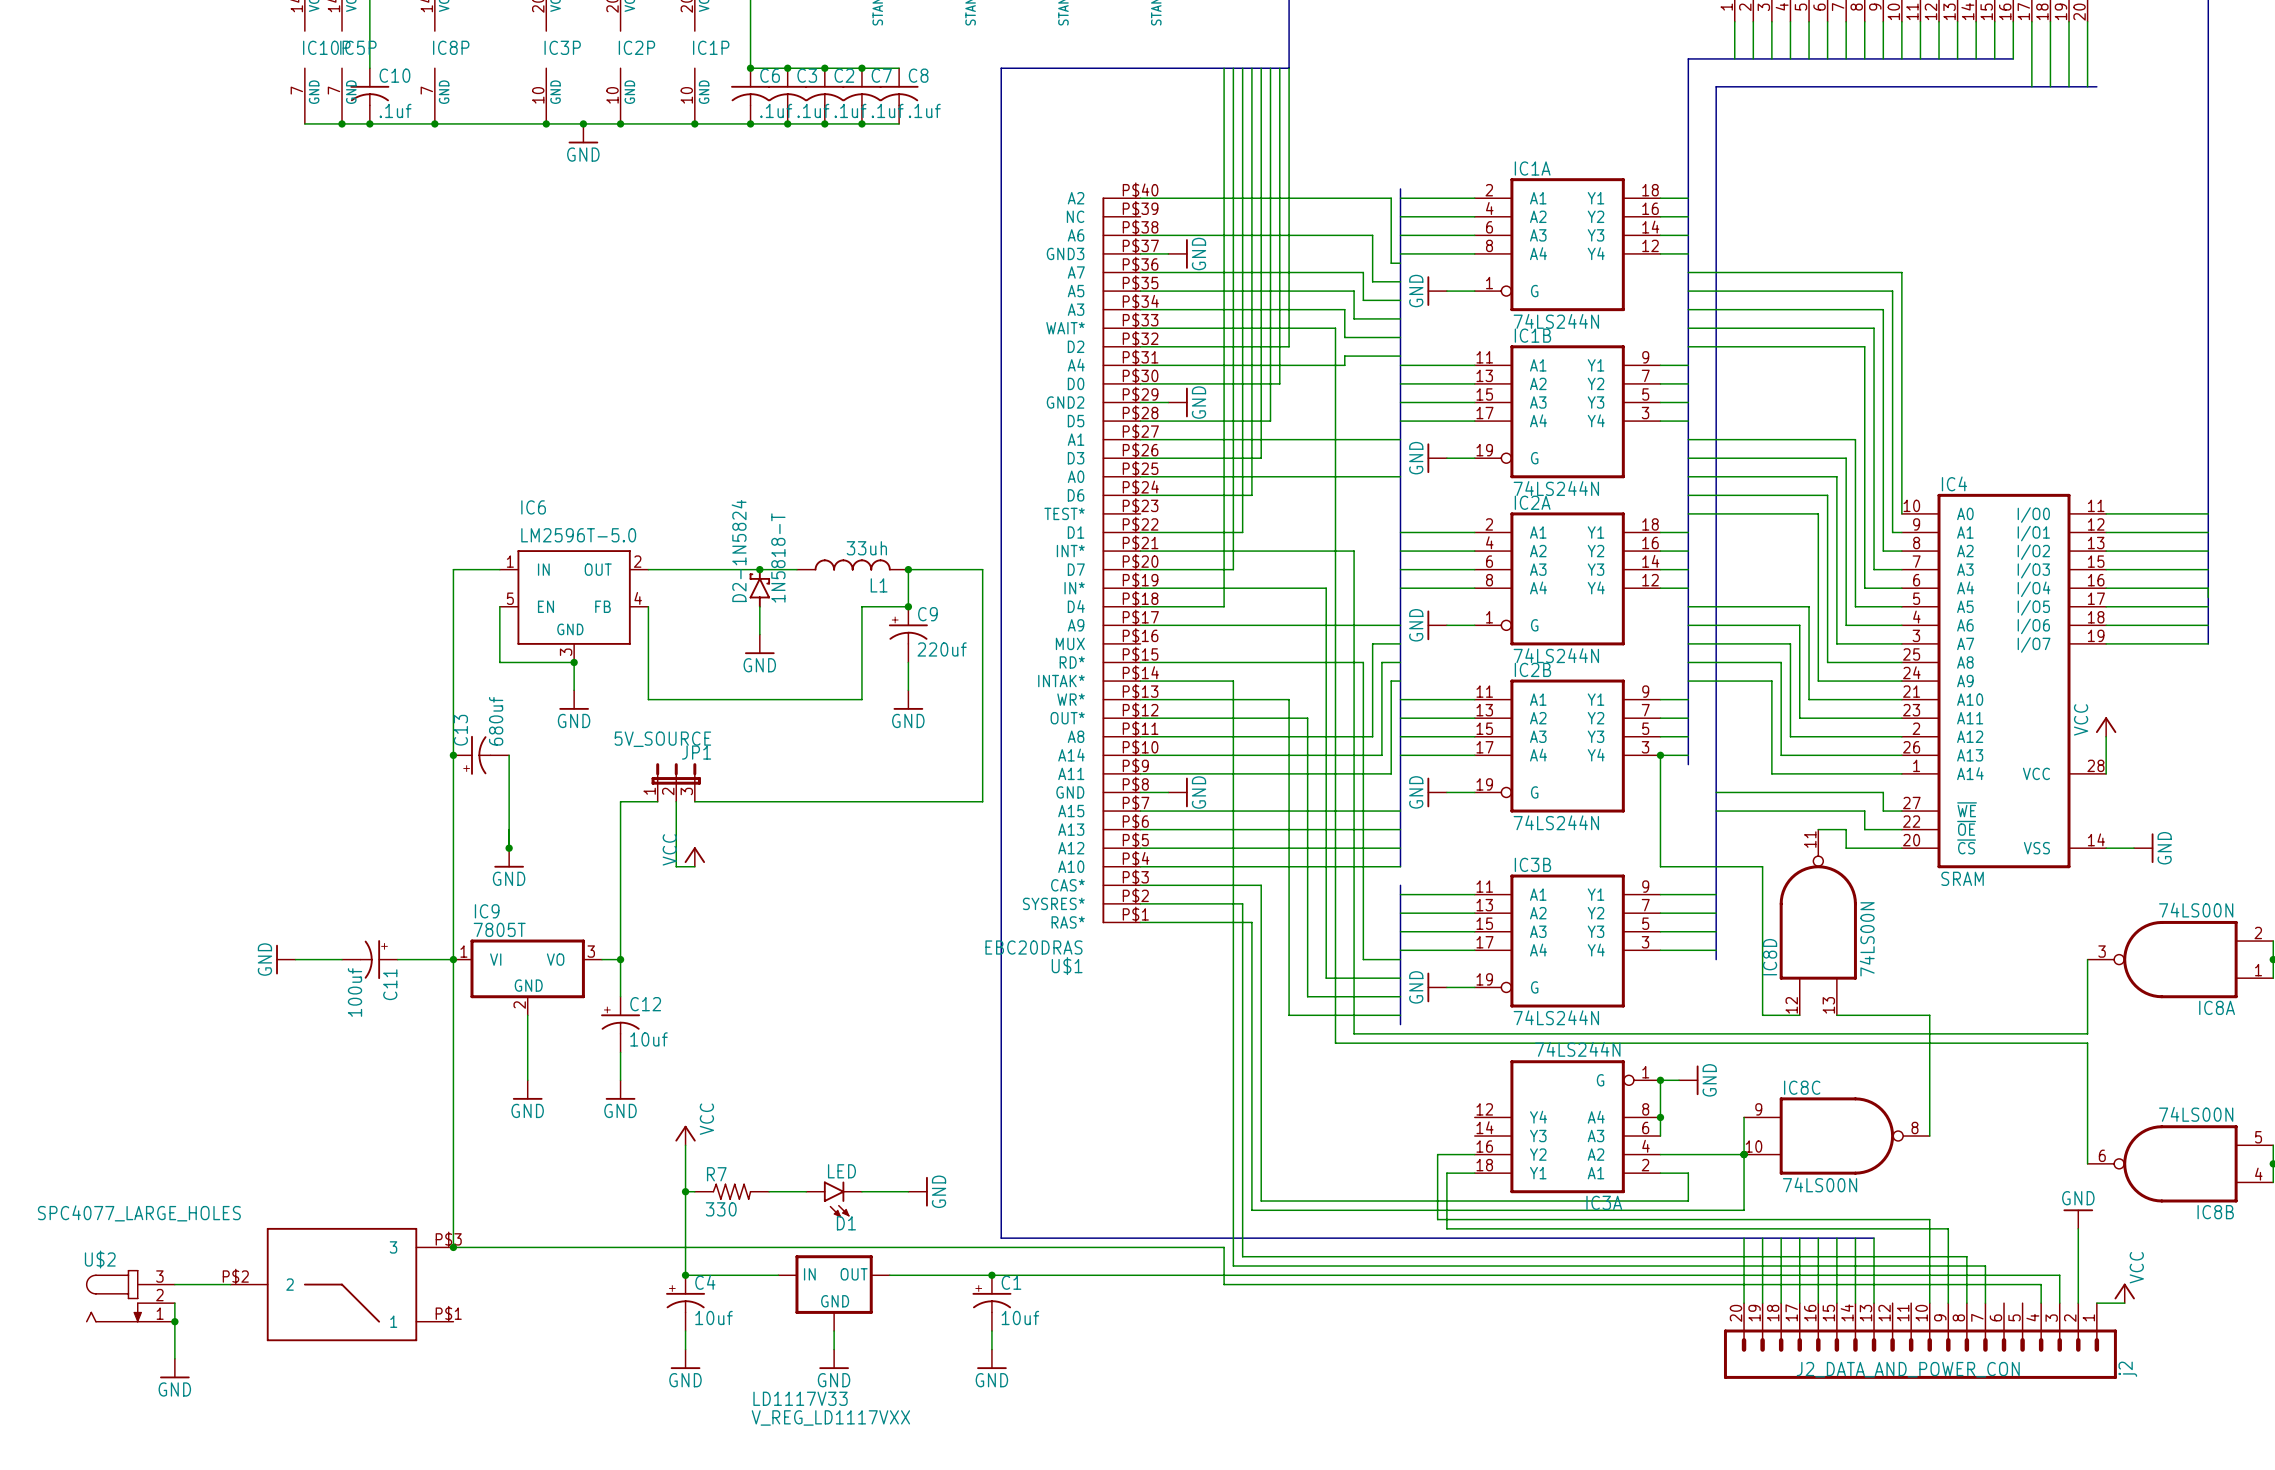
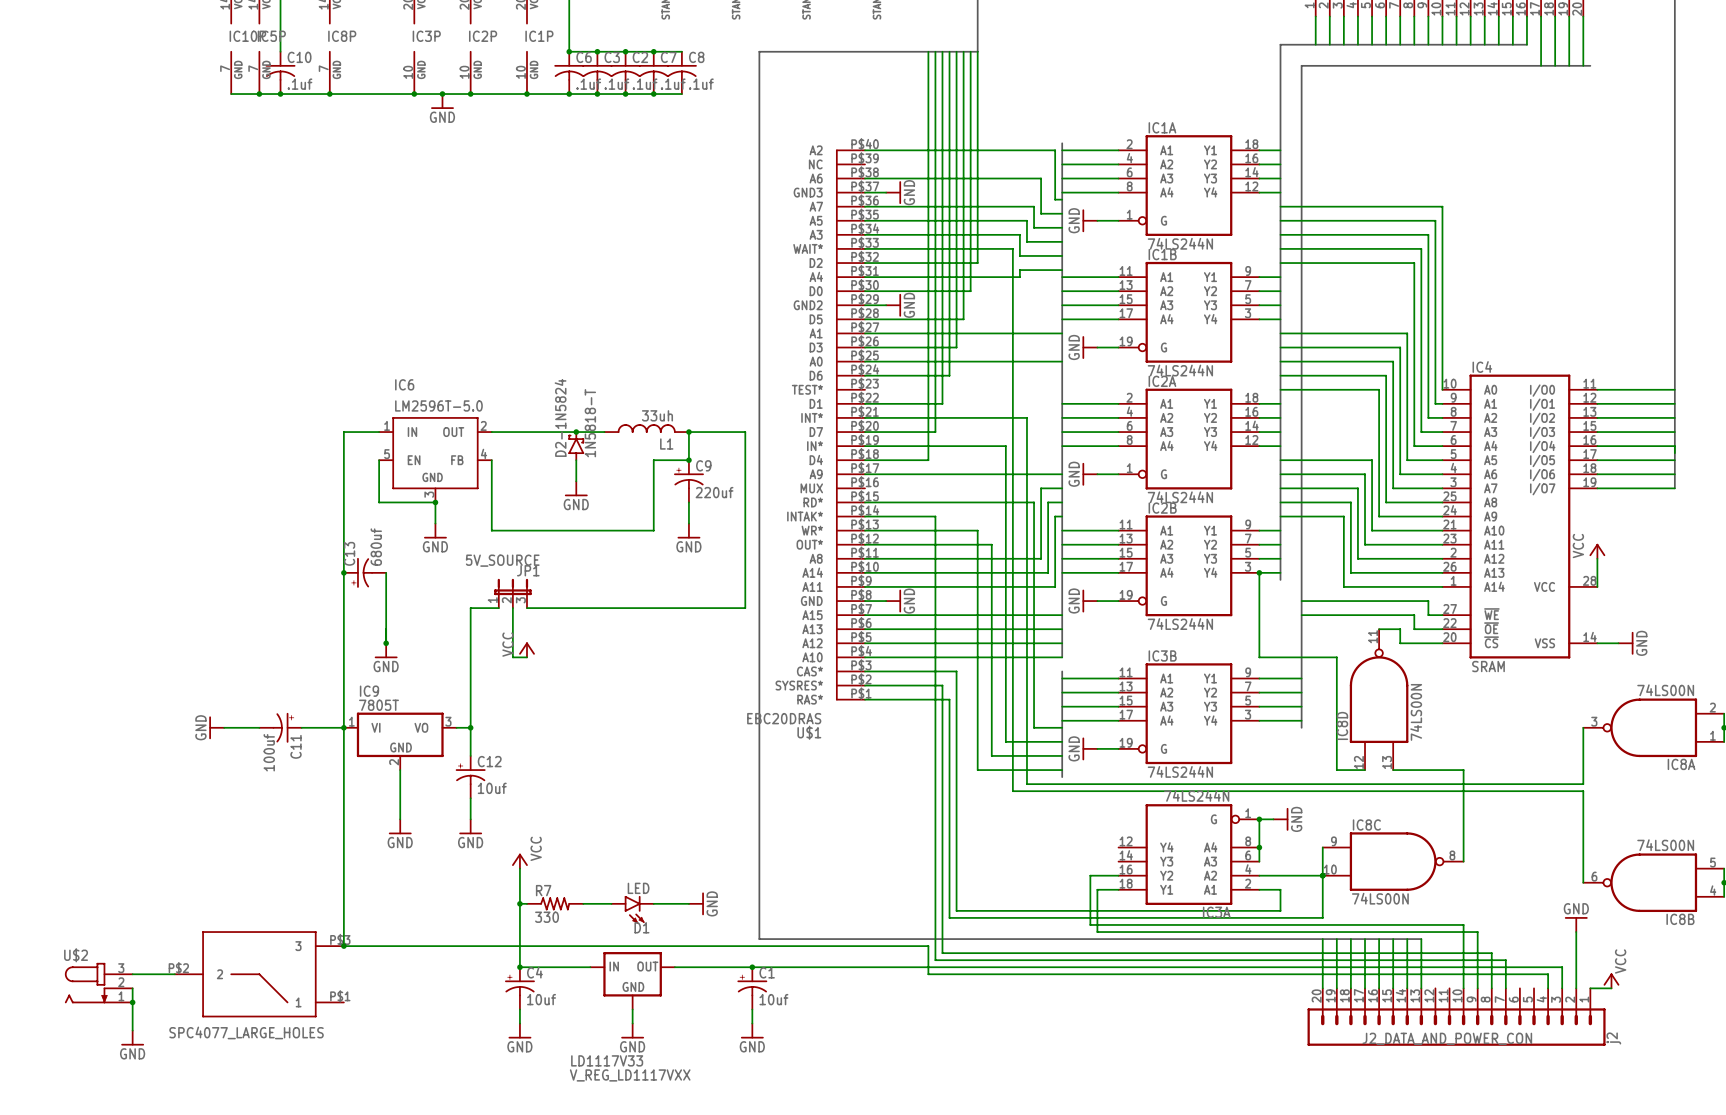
U$2 value position: SPC4077_LARGE_HOLES (139, 1213) -> SPC4077_LARGE_HOLES (246, 1032)

